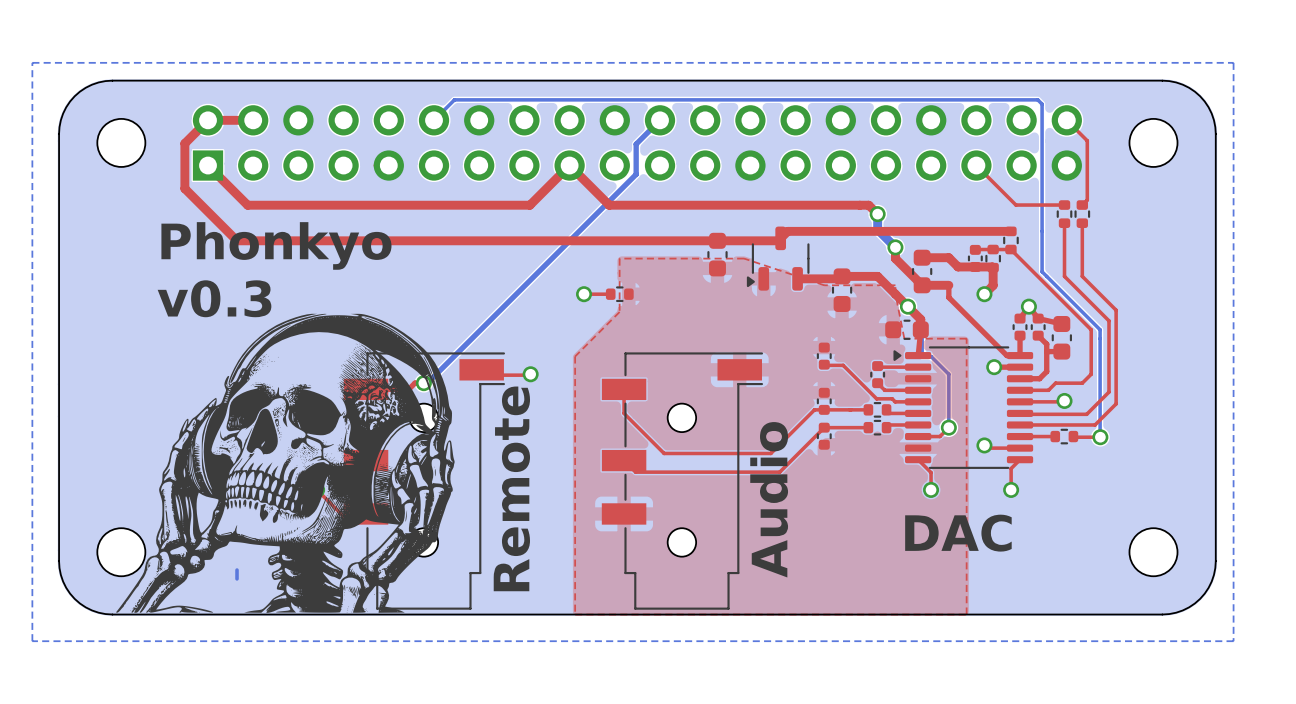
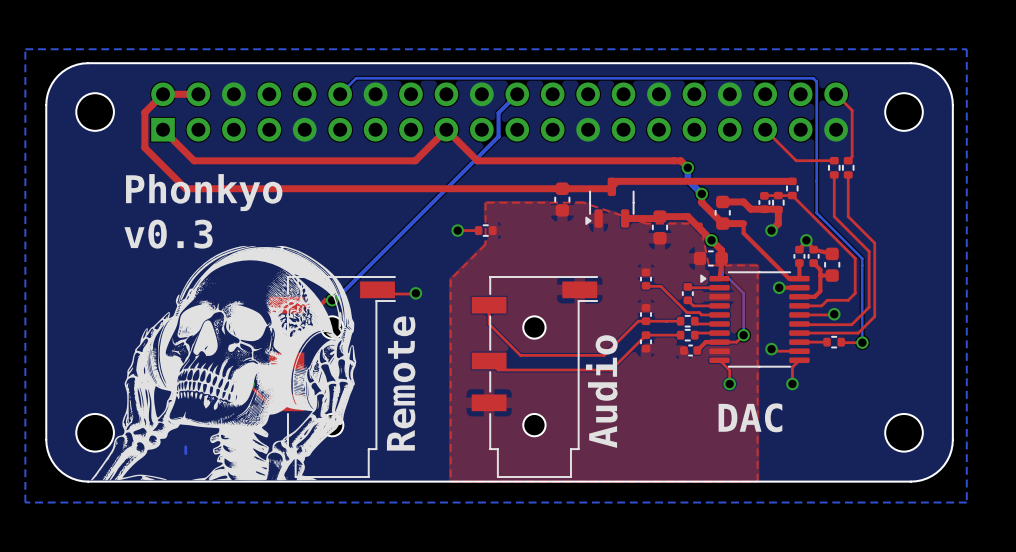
top track: none -> (719, 342) (705, 342) (697, 350)
part: none -> (690, 350)

